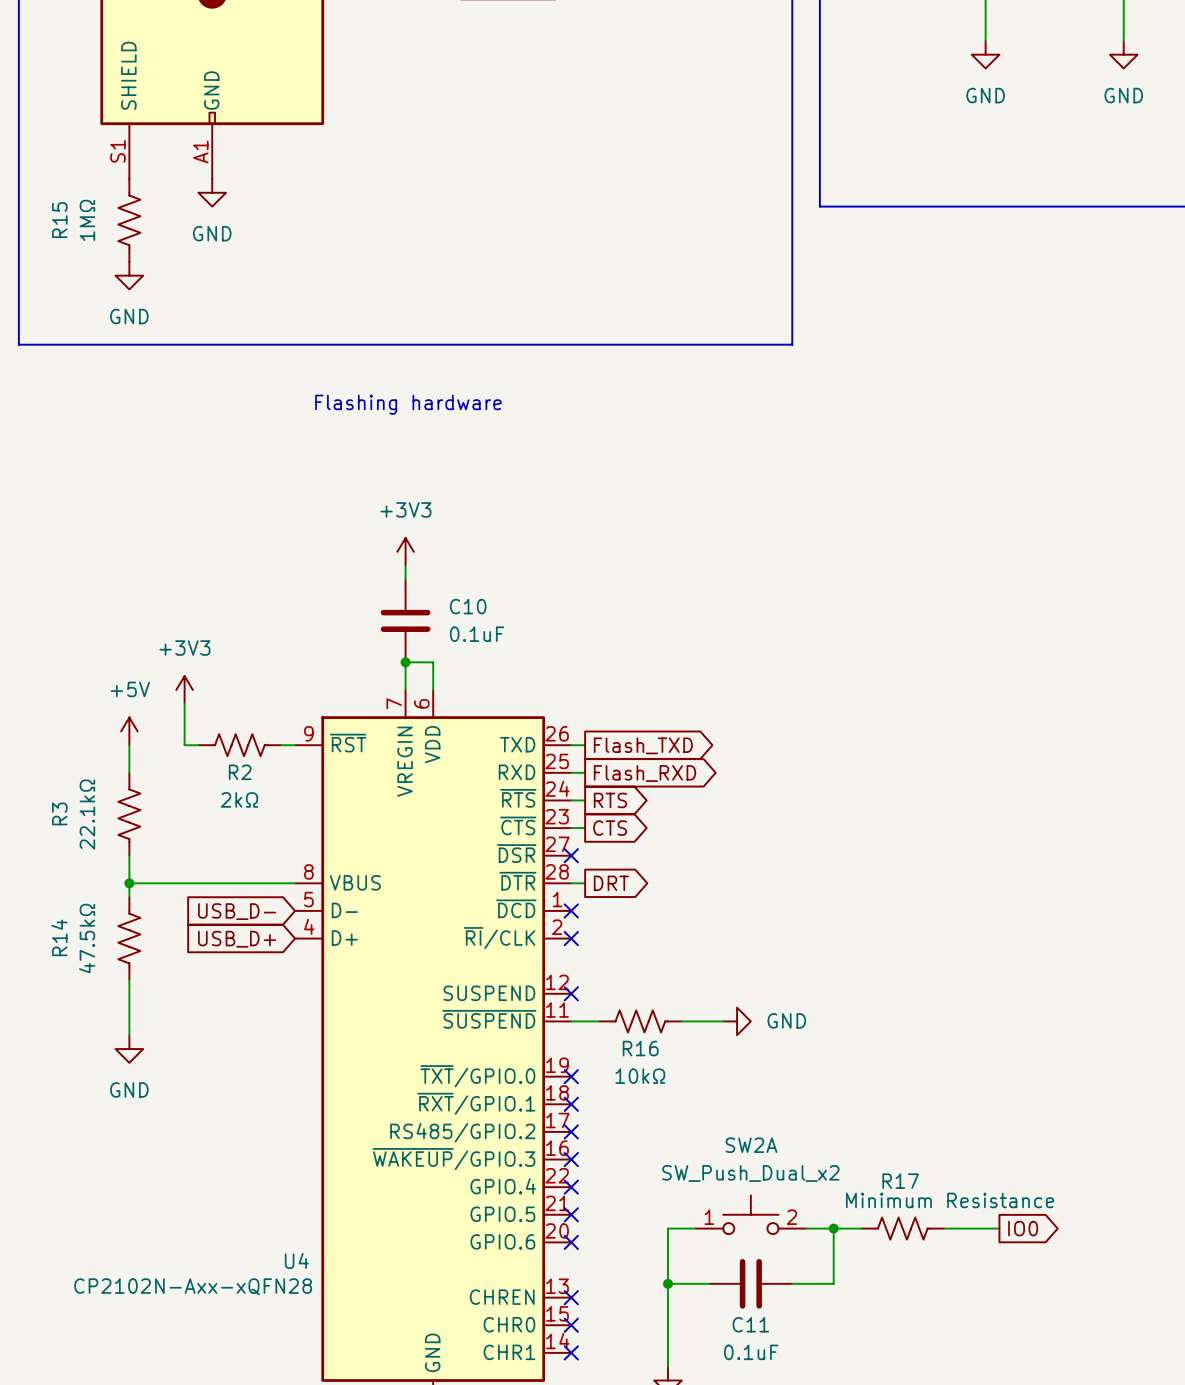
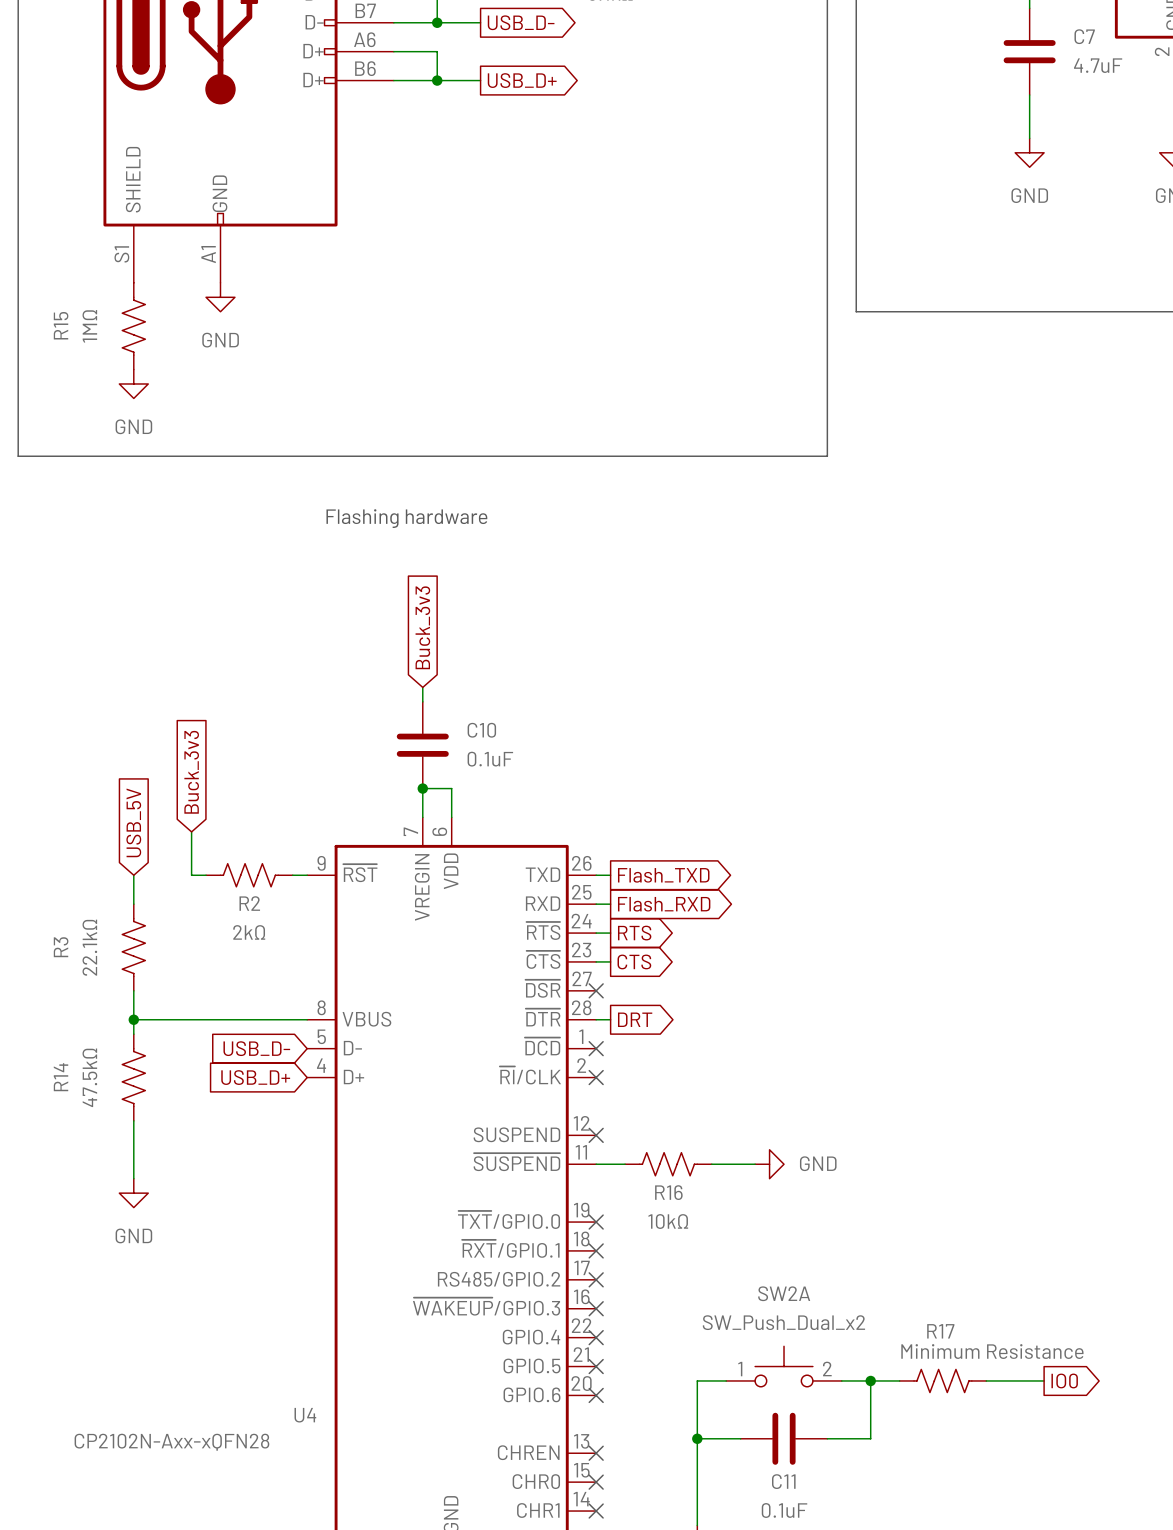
global label: none -> Buck_3v3 (422, 627)
power symbol: +3V3 (405, 551) -> none
global label: none -> Buck_3v3 (191, 772)
global label: none -> USB_5V (133, 822)
power symbol: +3V3 (184, 689) -> none
power symbol: +5V (129, 731) -> none

